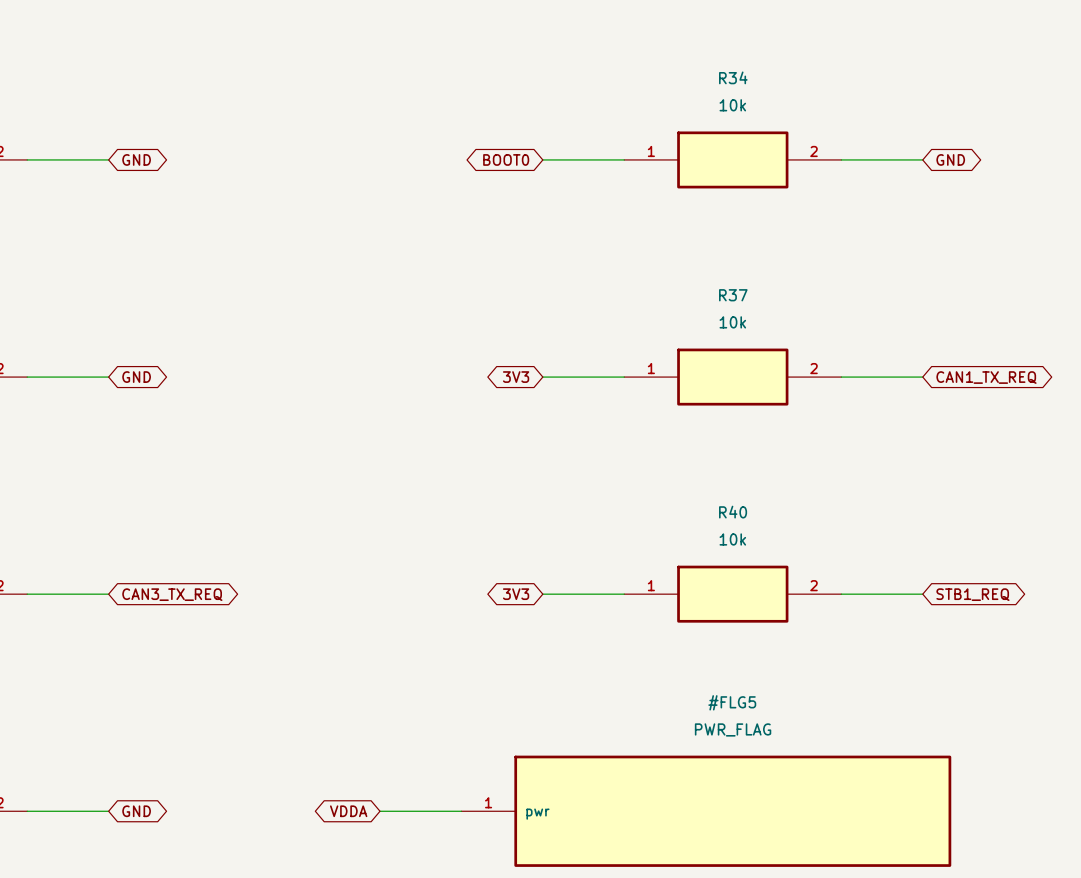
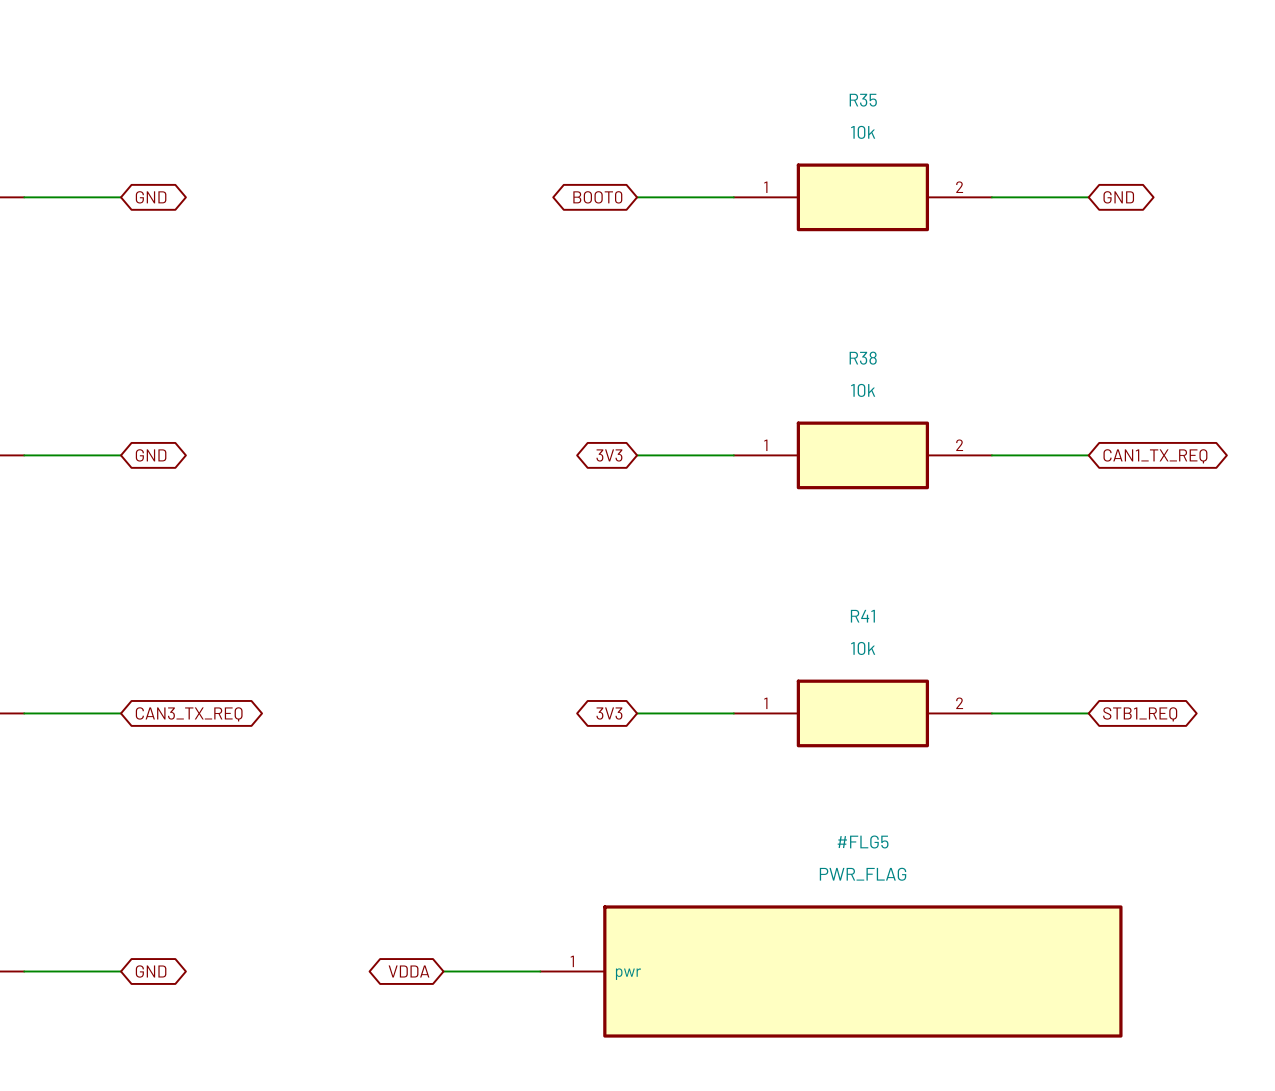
R34 name: R34 (733, 77) -> R35 (863, 100)
R37 name: R37 (733, 295) -> R38 (863, 358)
R40 name: R40 (733, 512) -> R41 (862, 616)

